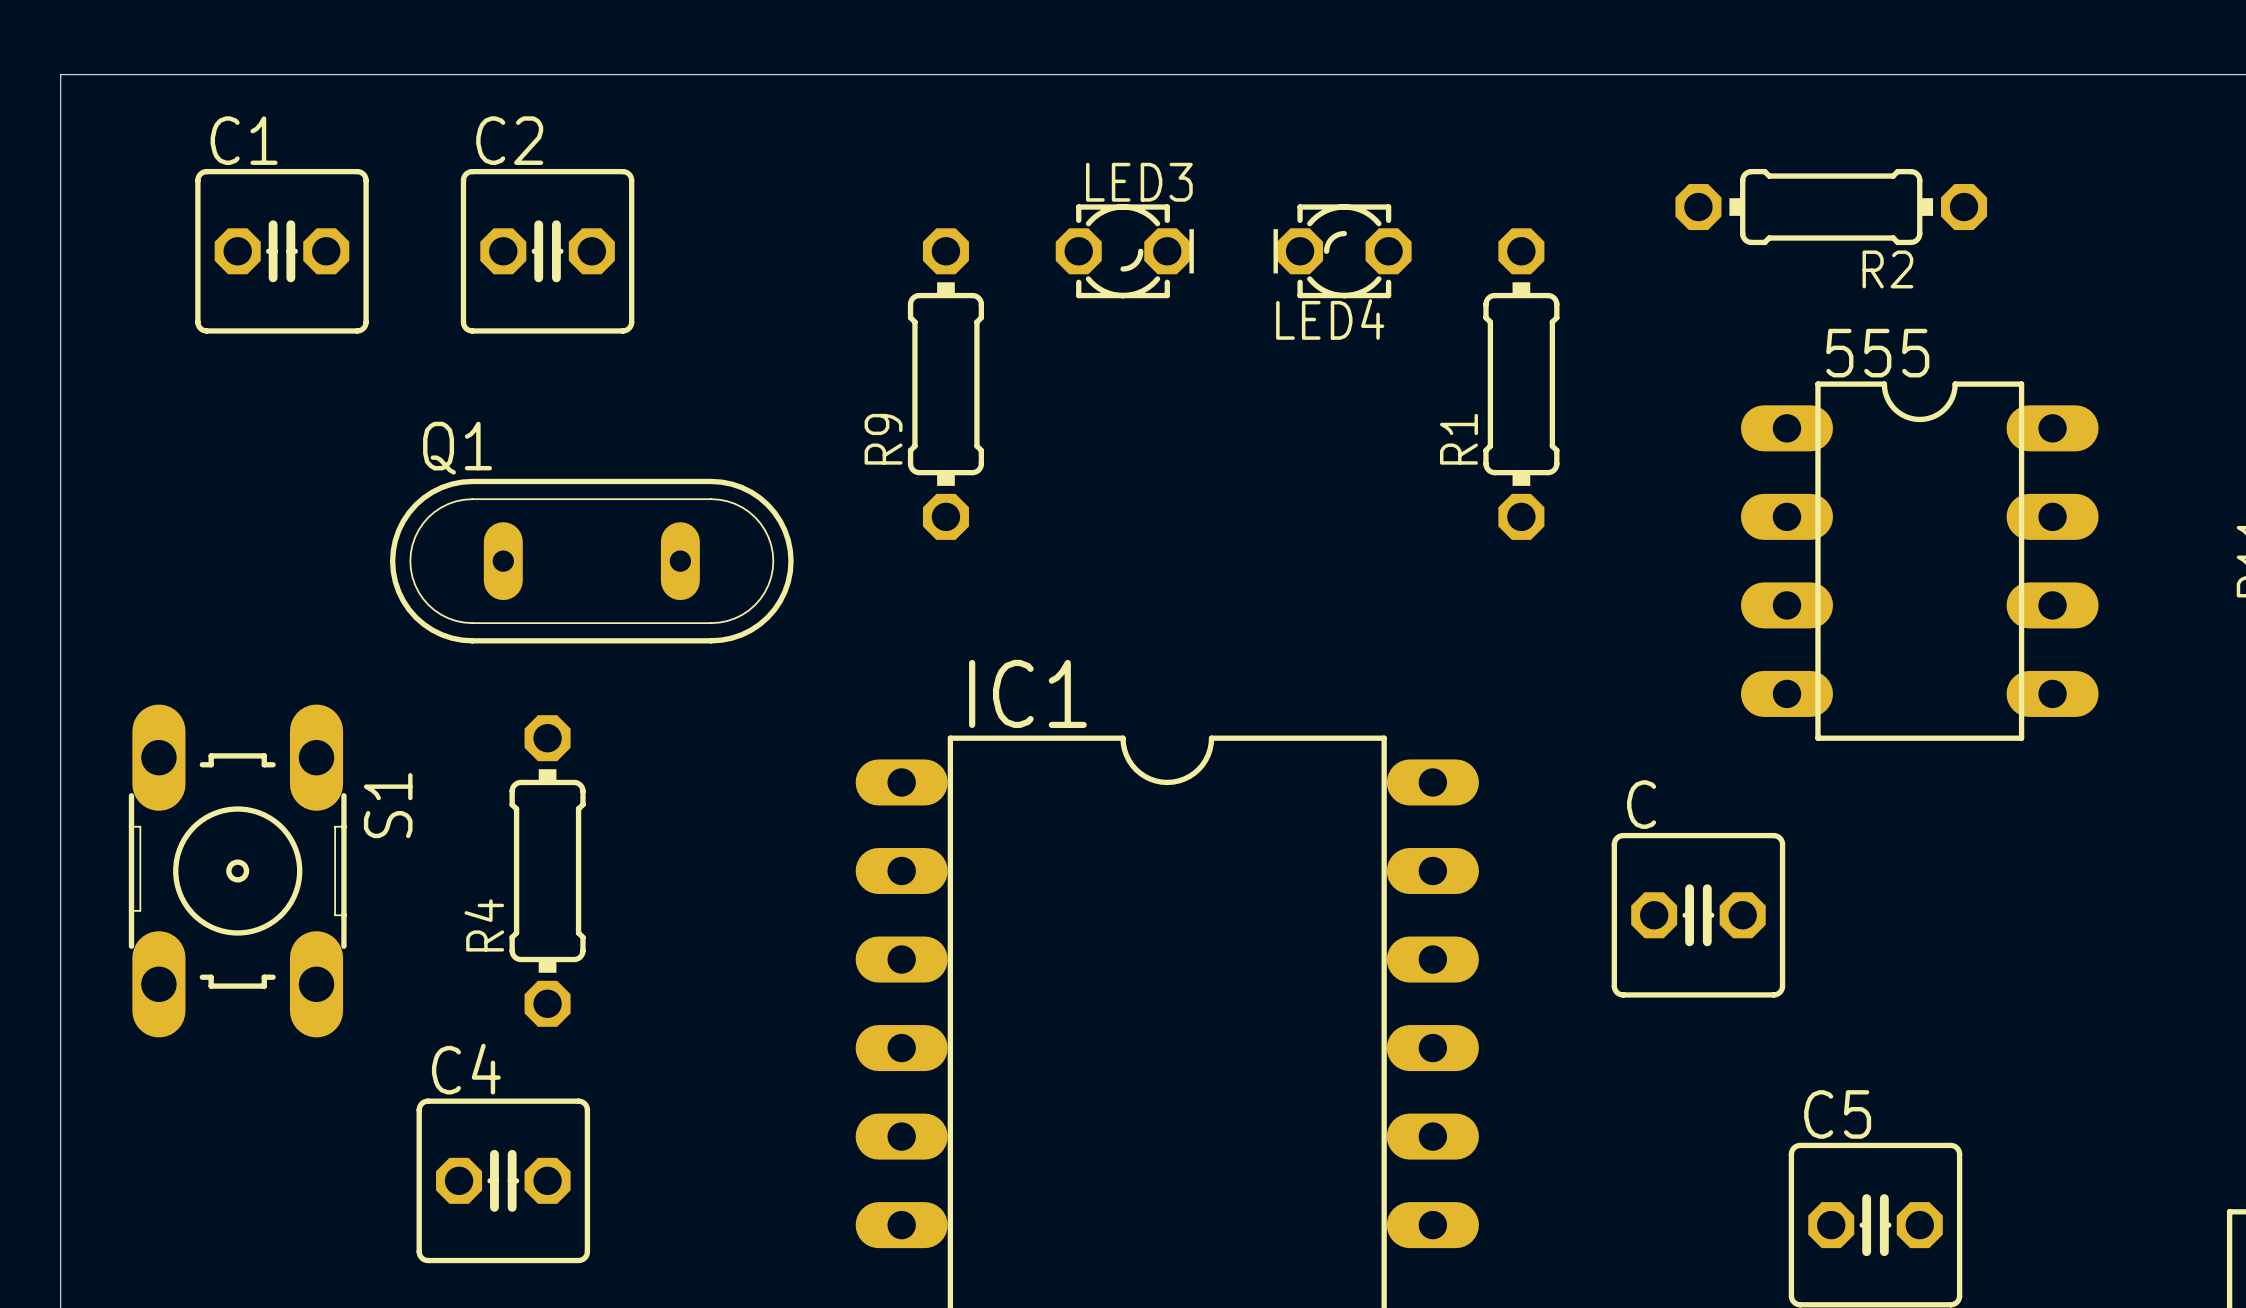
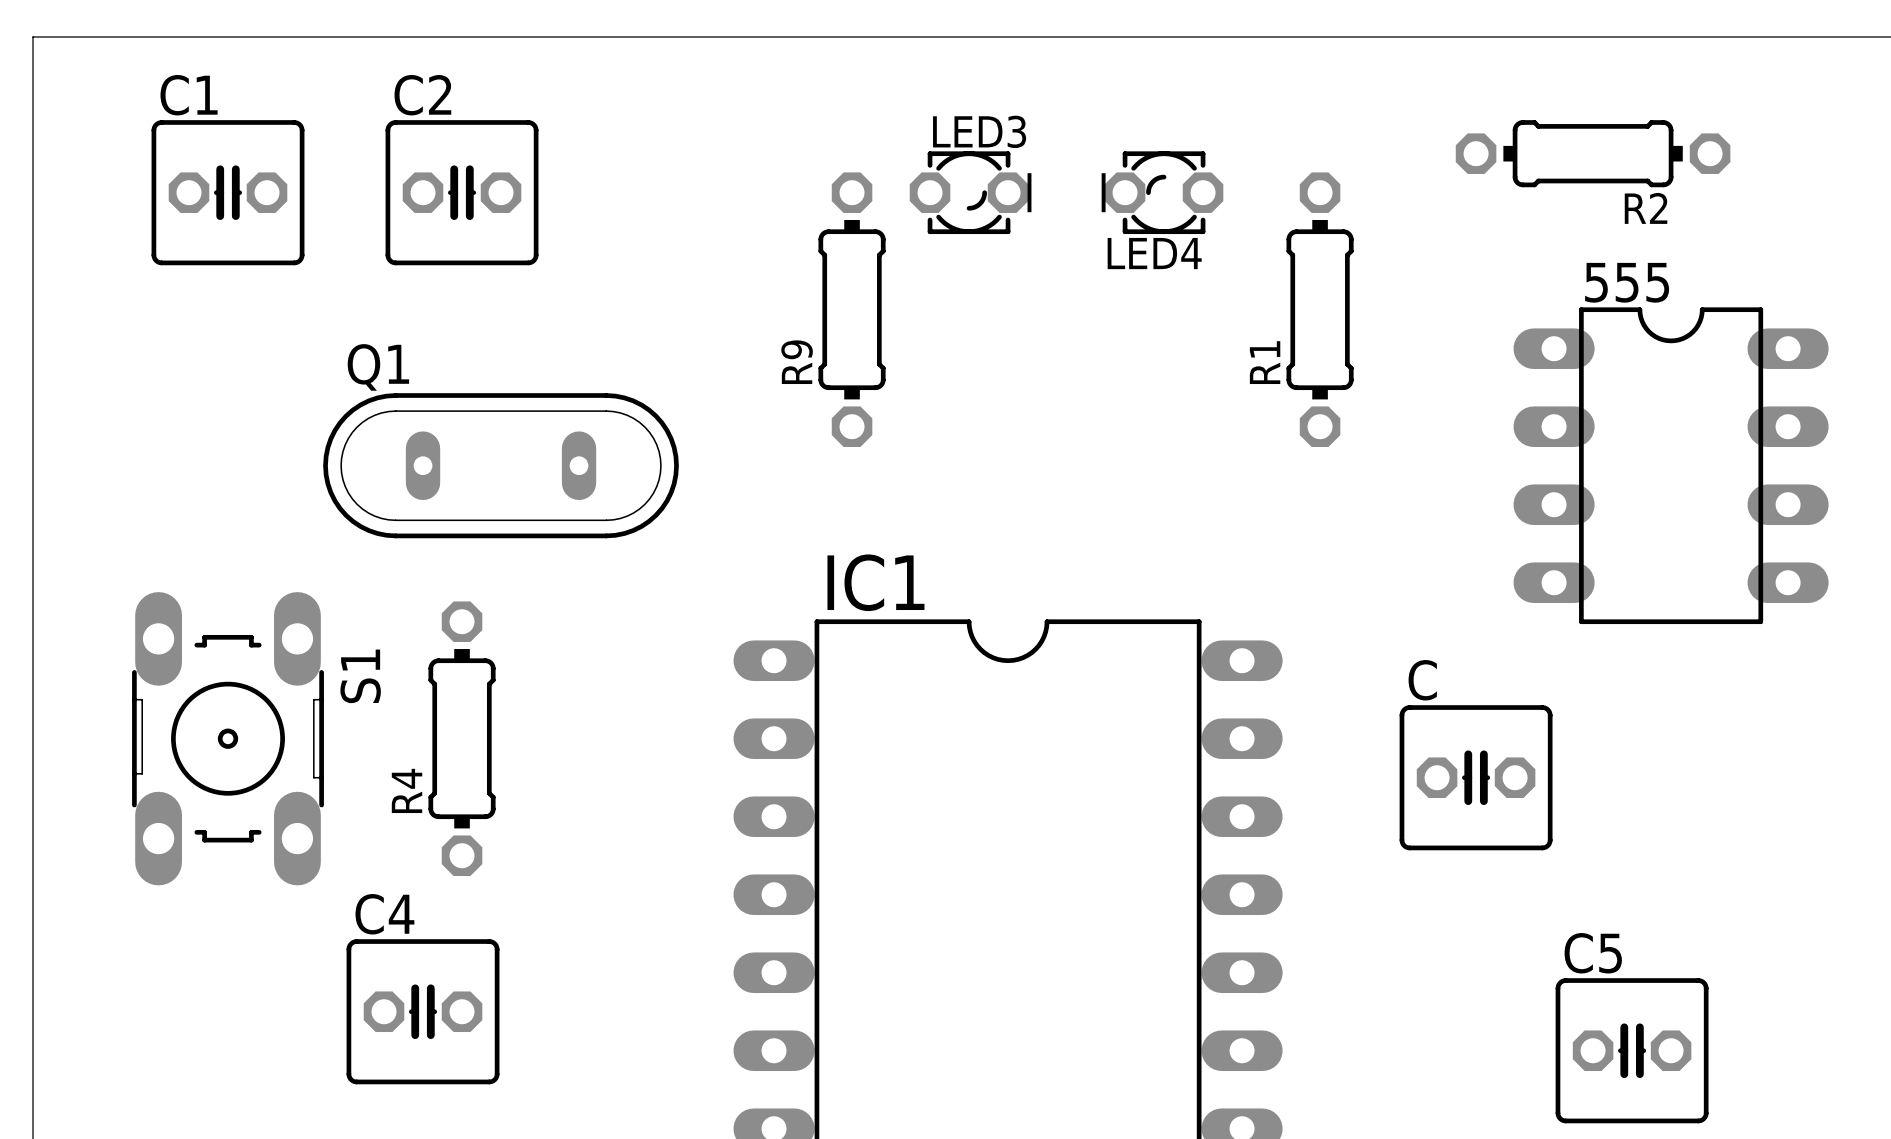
R9 position: (945, 384) -> (852, 309)
S1 position: (237, 870) -> (228, 738)

